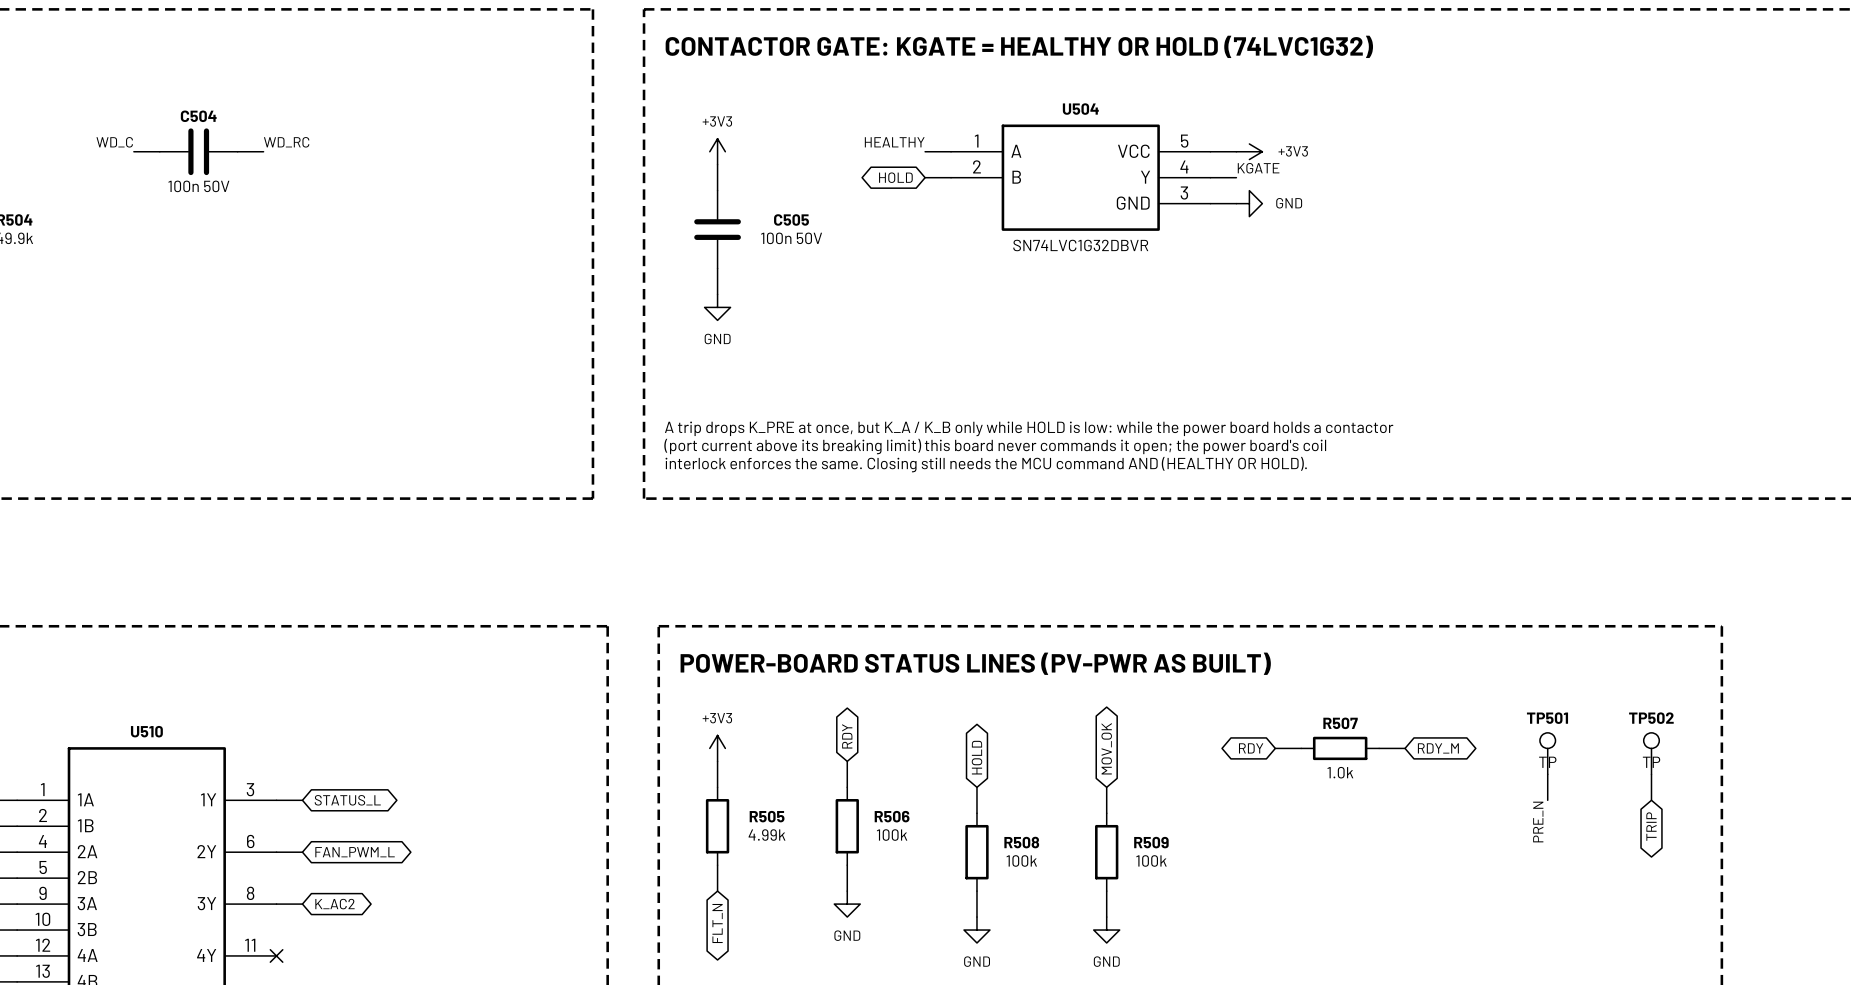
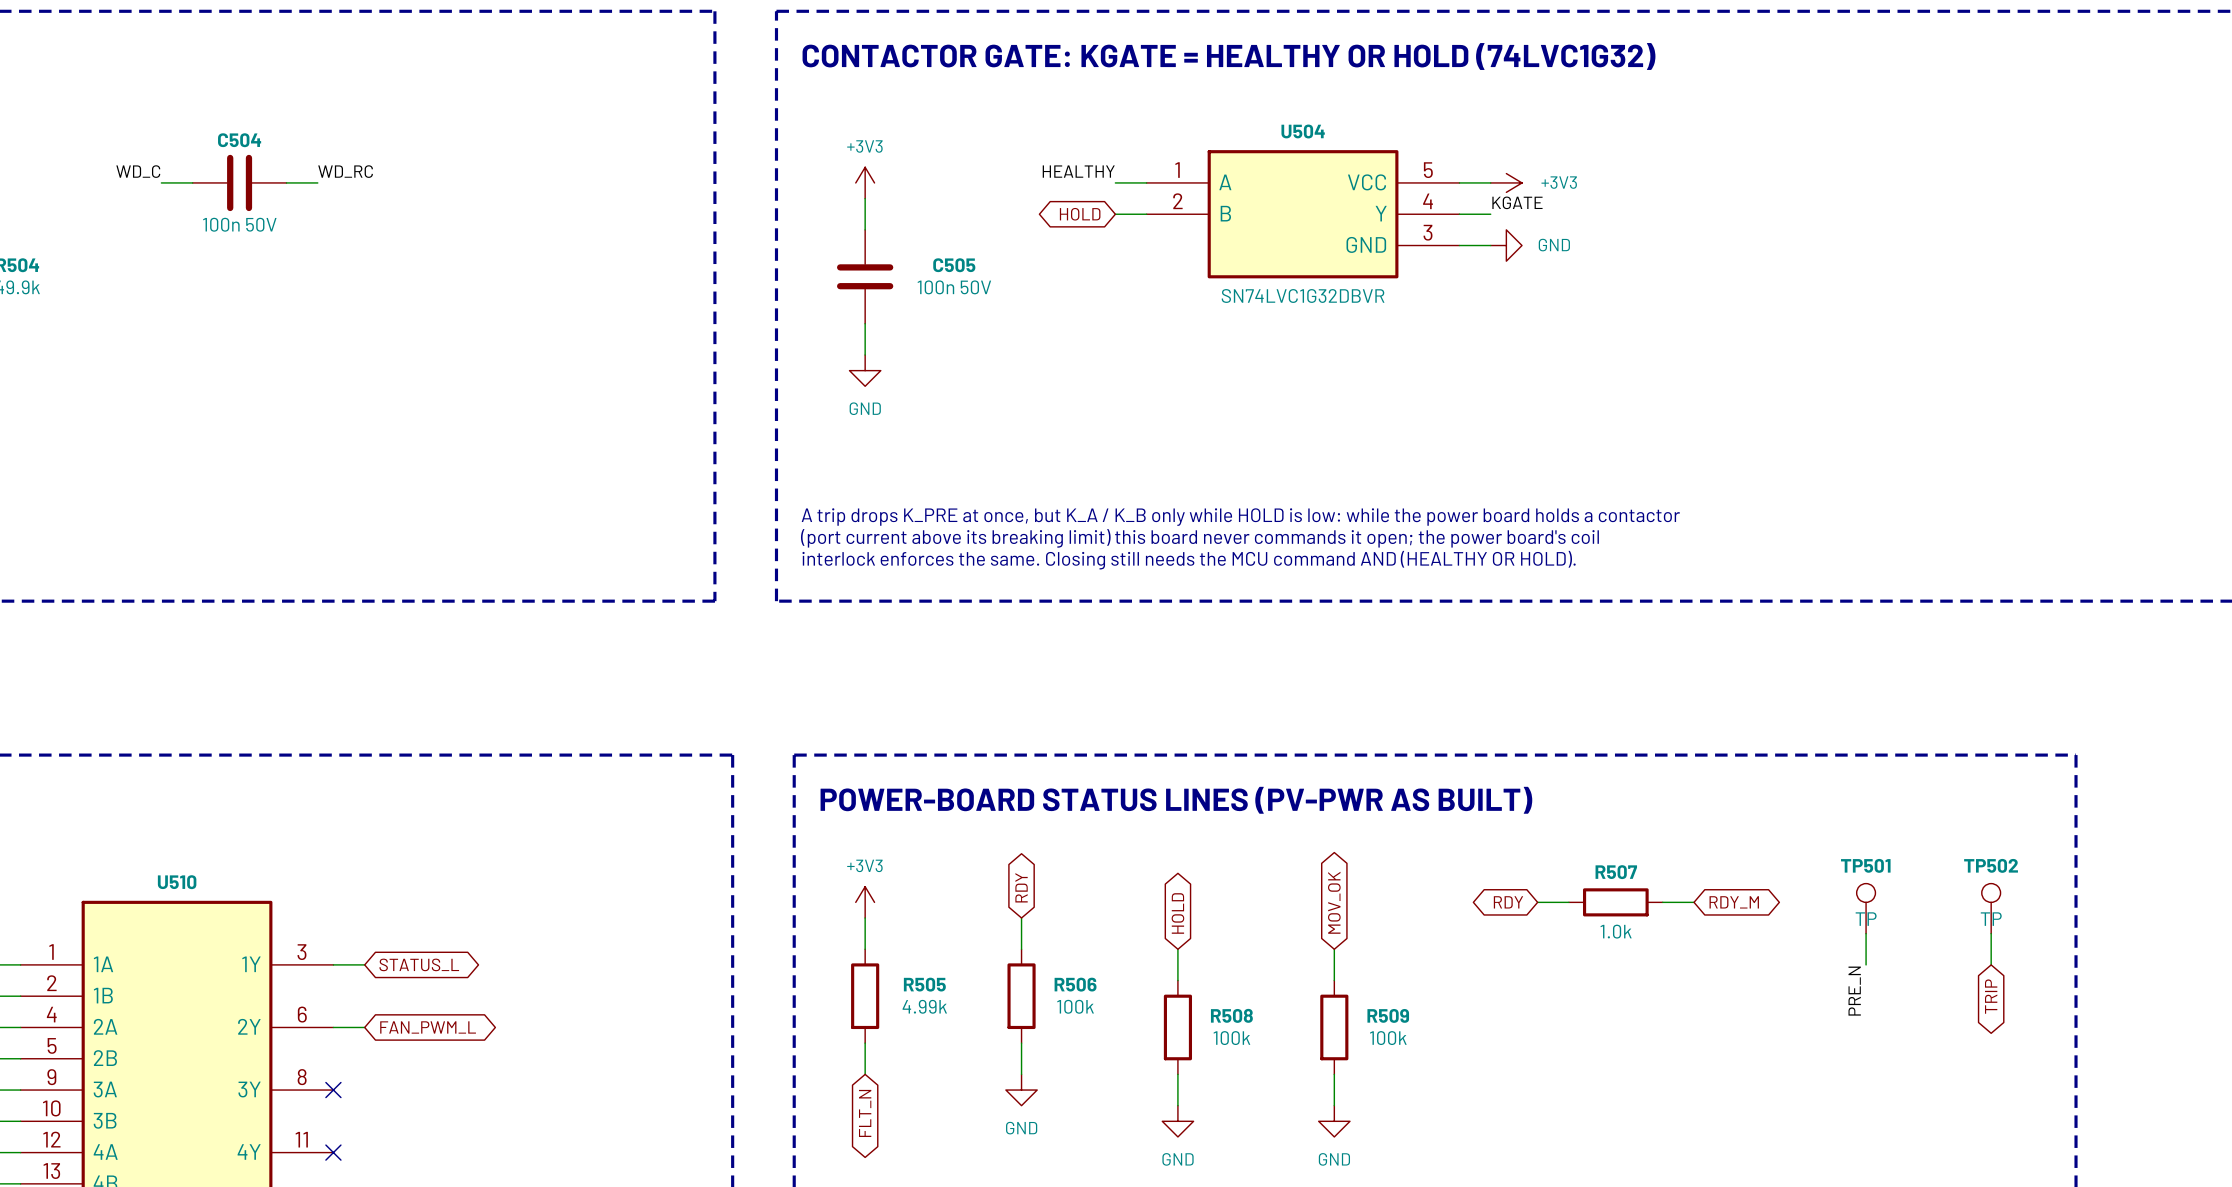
wire: (276, 904) (302, 904) -> none
no-connect mark: none -> (333, 1090)
global label: K_AC2 (334, 904) -> none

